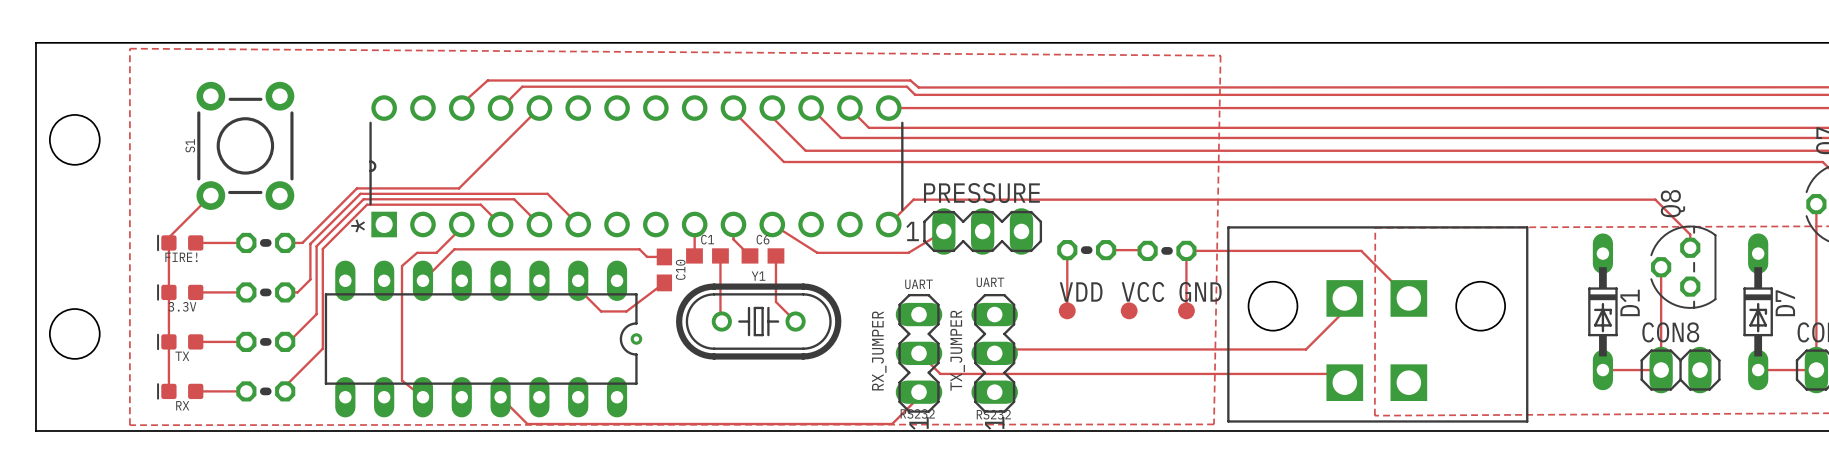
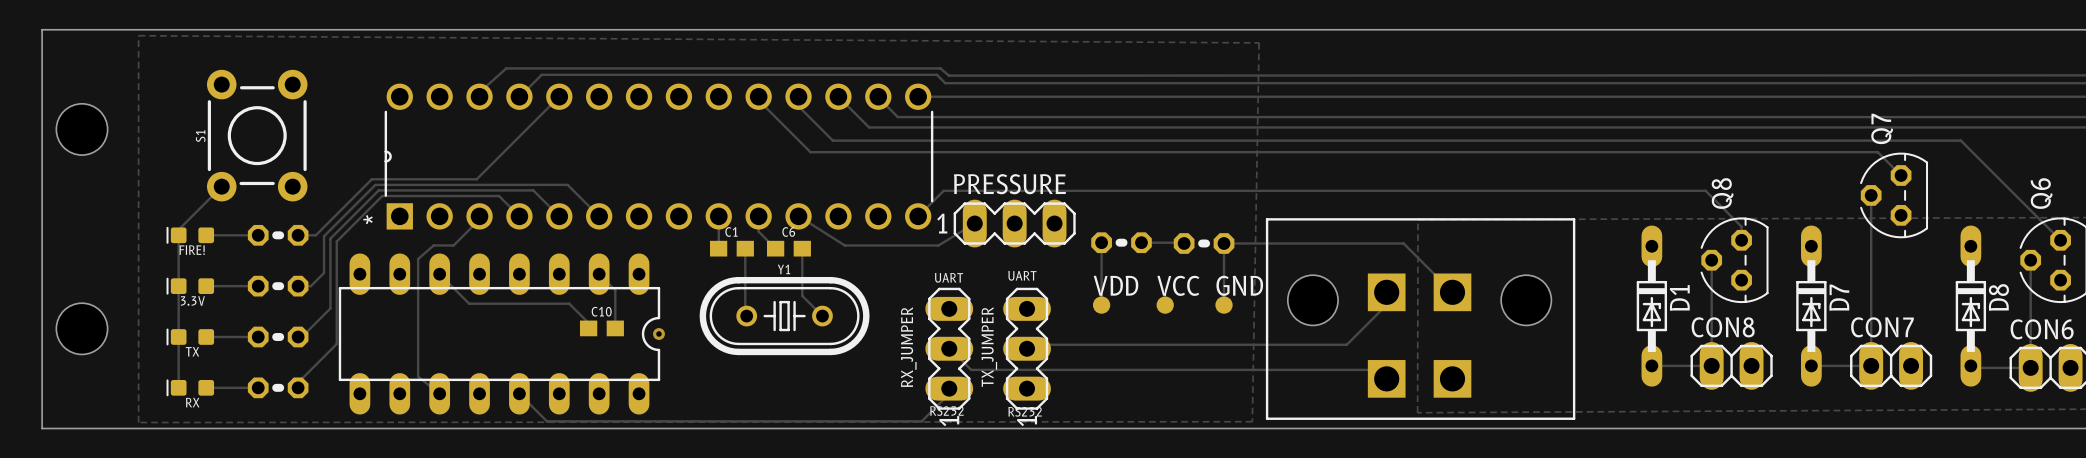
track: (664, 256) (647, 256) (639, 249) (454, 249) (422, 280) -> (588, 328) (588, 323) (569, 303) (469, 303) (439, 274)
C10 rotation: 0° (664, 269) -> 90° clockwise (601, 328)
C10 position: (664, 269) -> (601, 328)
track: (578, 280) (578, 288) (601, 311) (626, 311) (664, 282) -> (599, 274) (615, 290) (615, 328)

